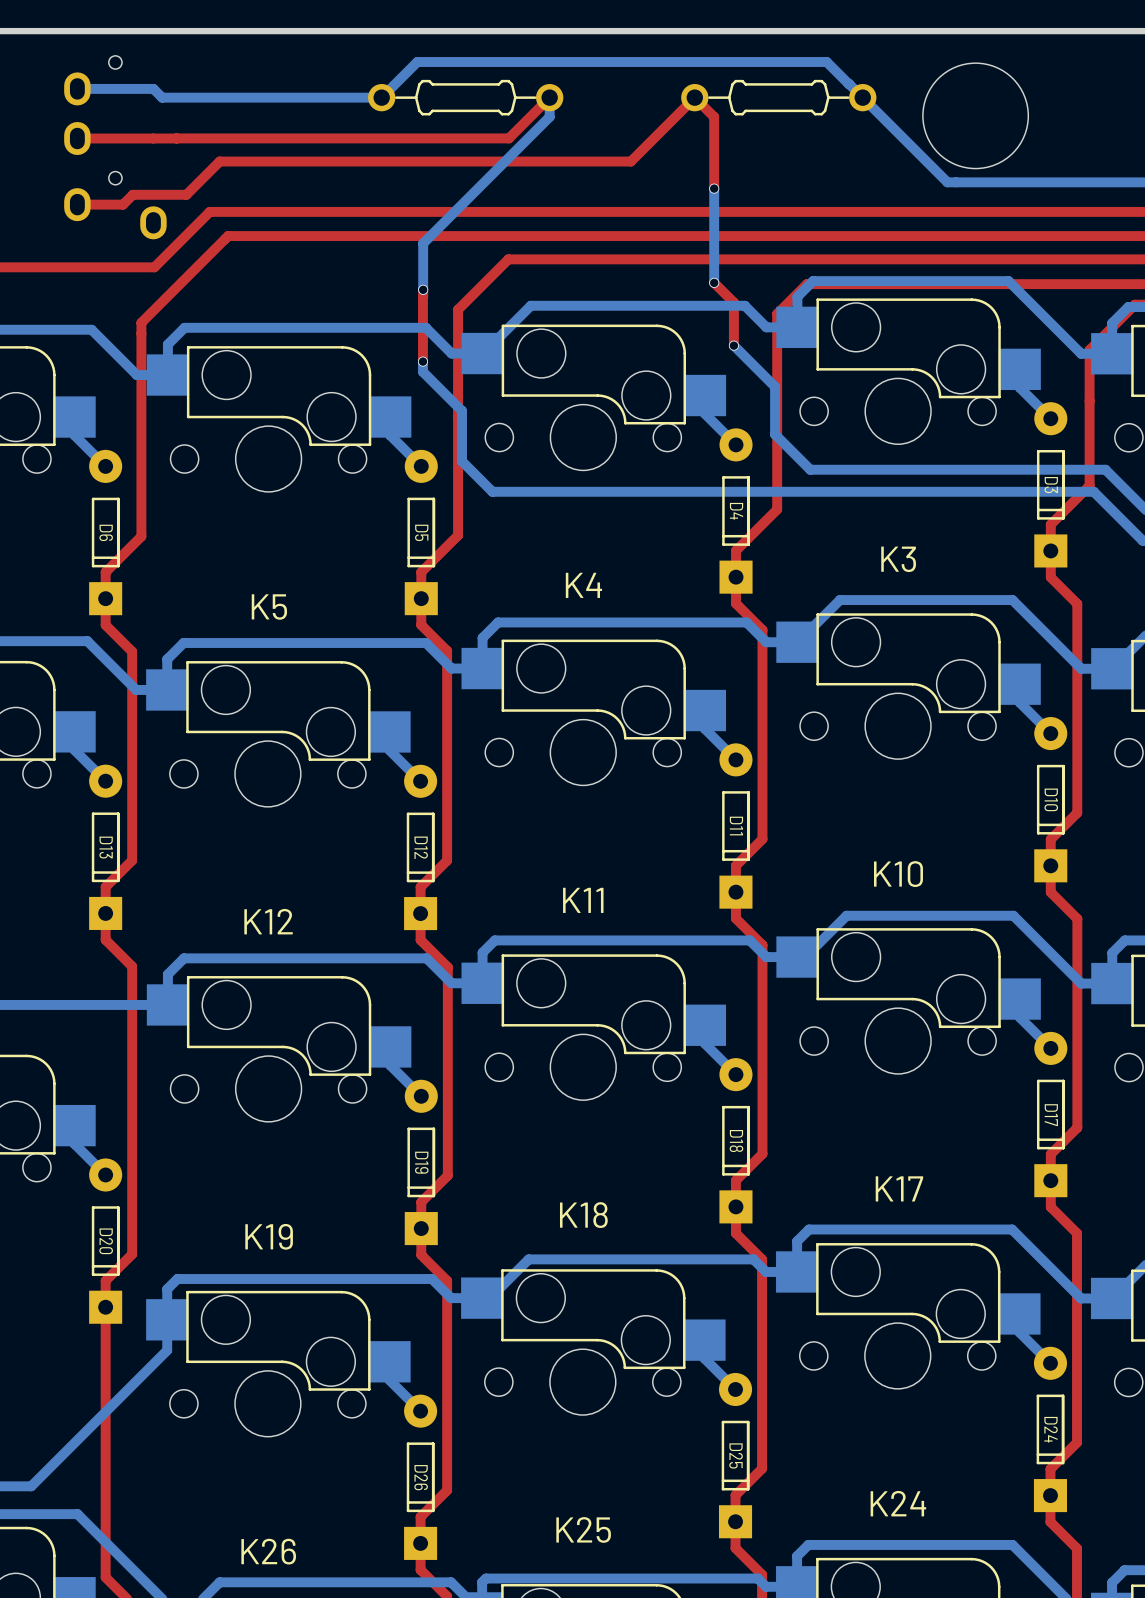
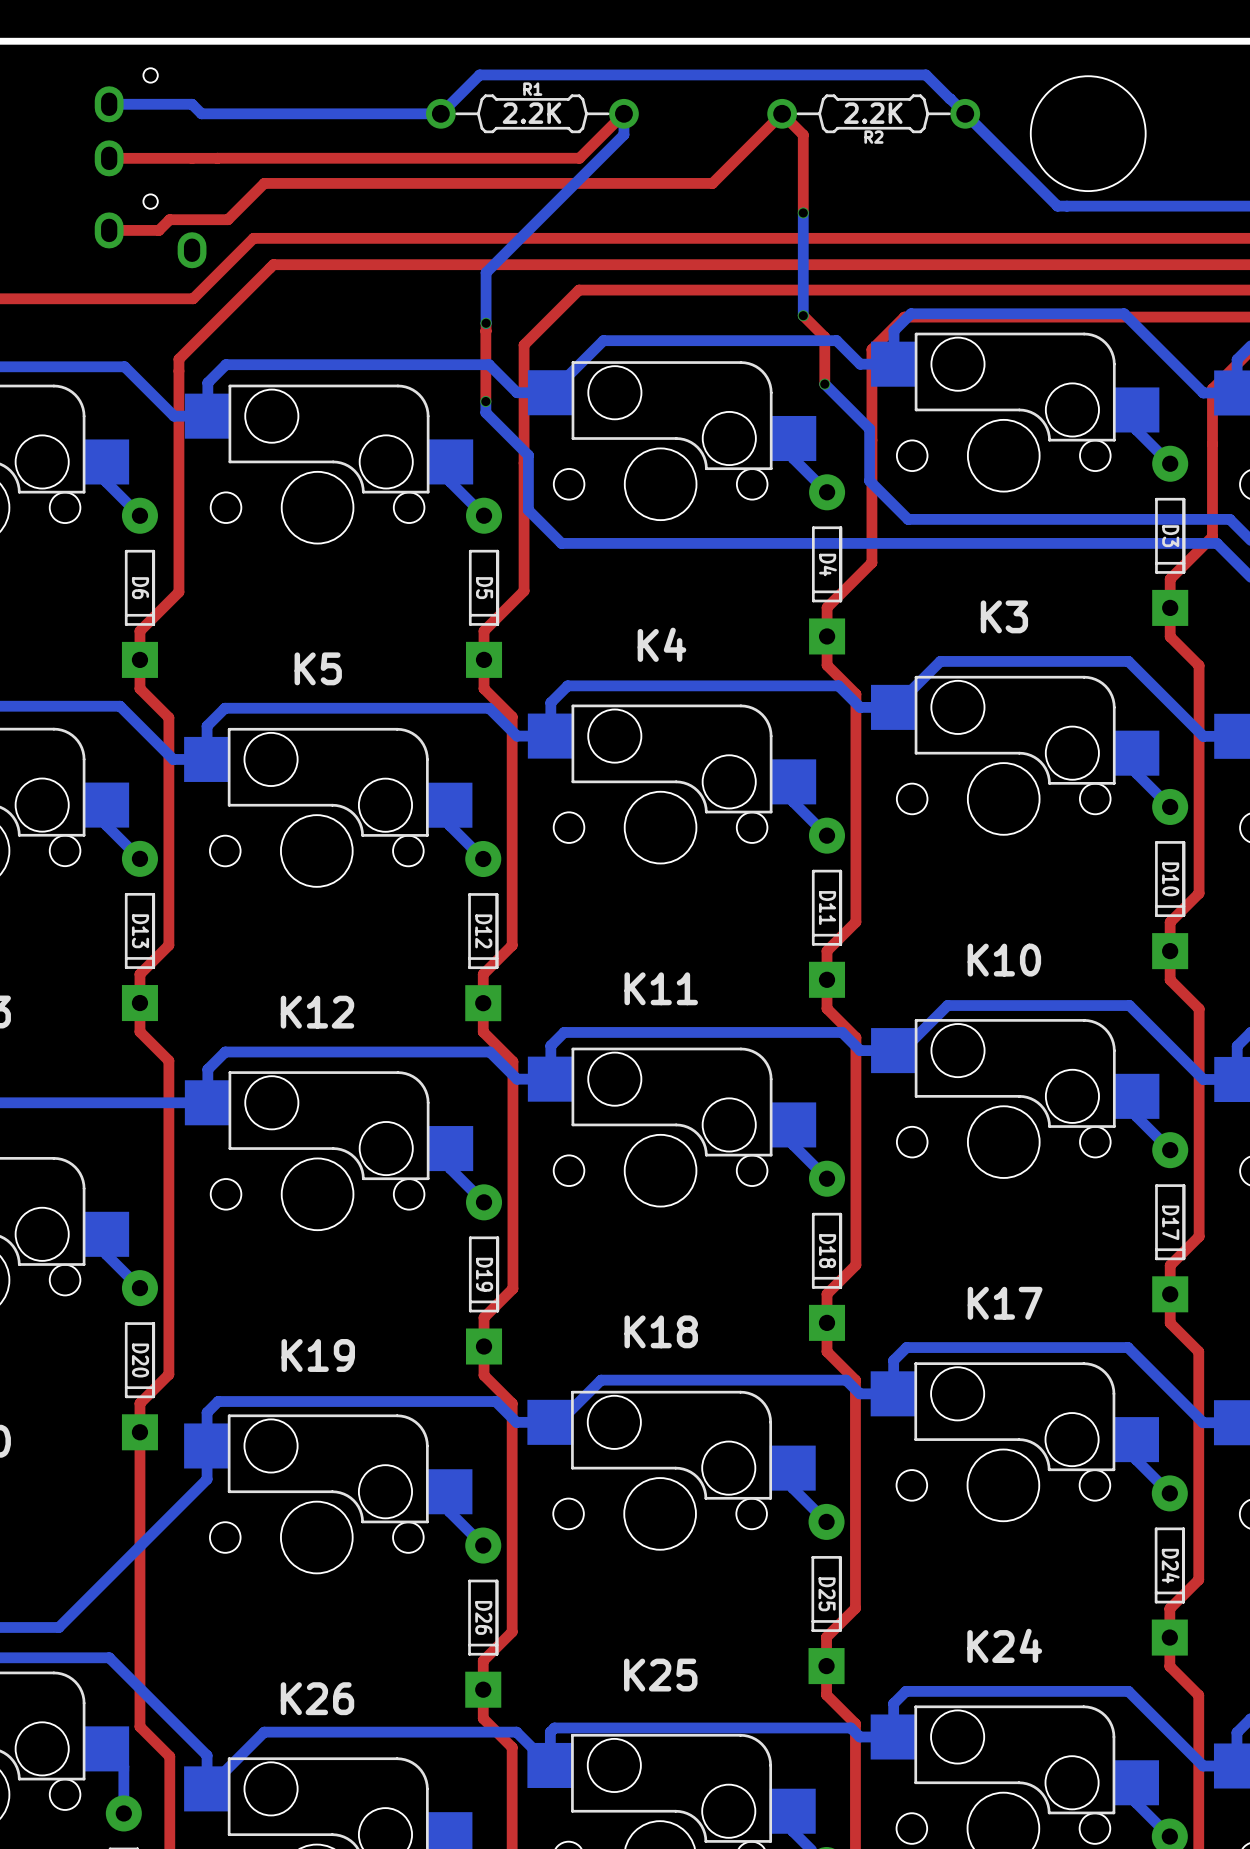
R1 name: none -> R1 (532, 89)
R1 value: none -> 2.2K (531, 113)
R2 value: none -> 2.2K (873, 113)
R2 name: none -> R2 (873, 137)

